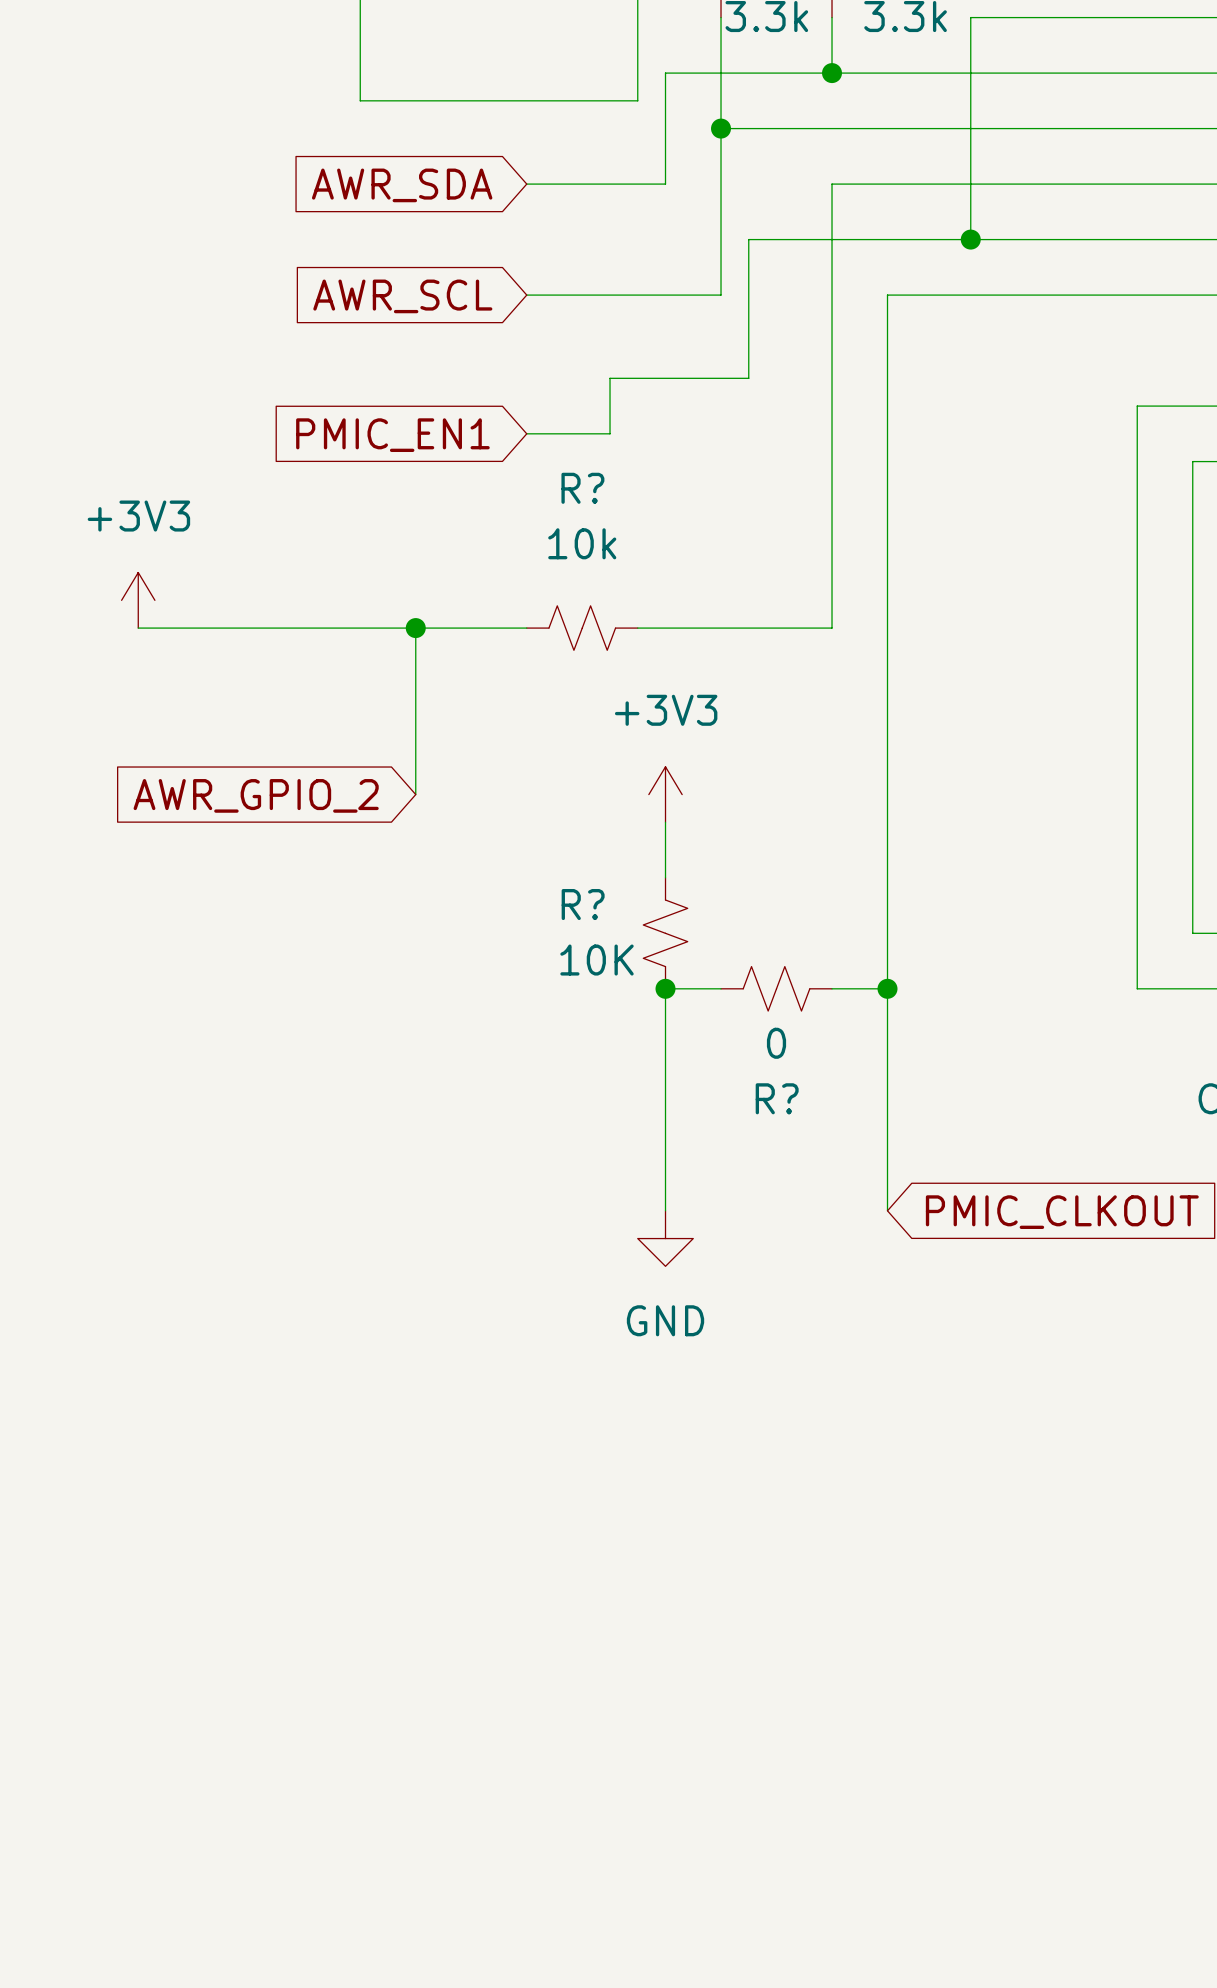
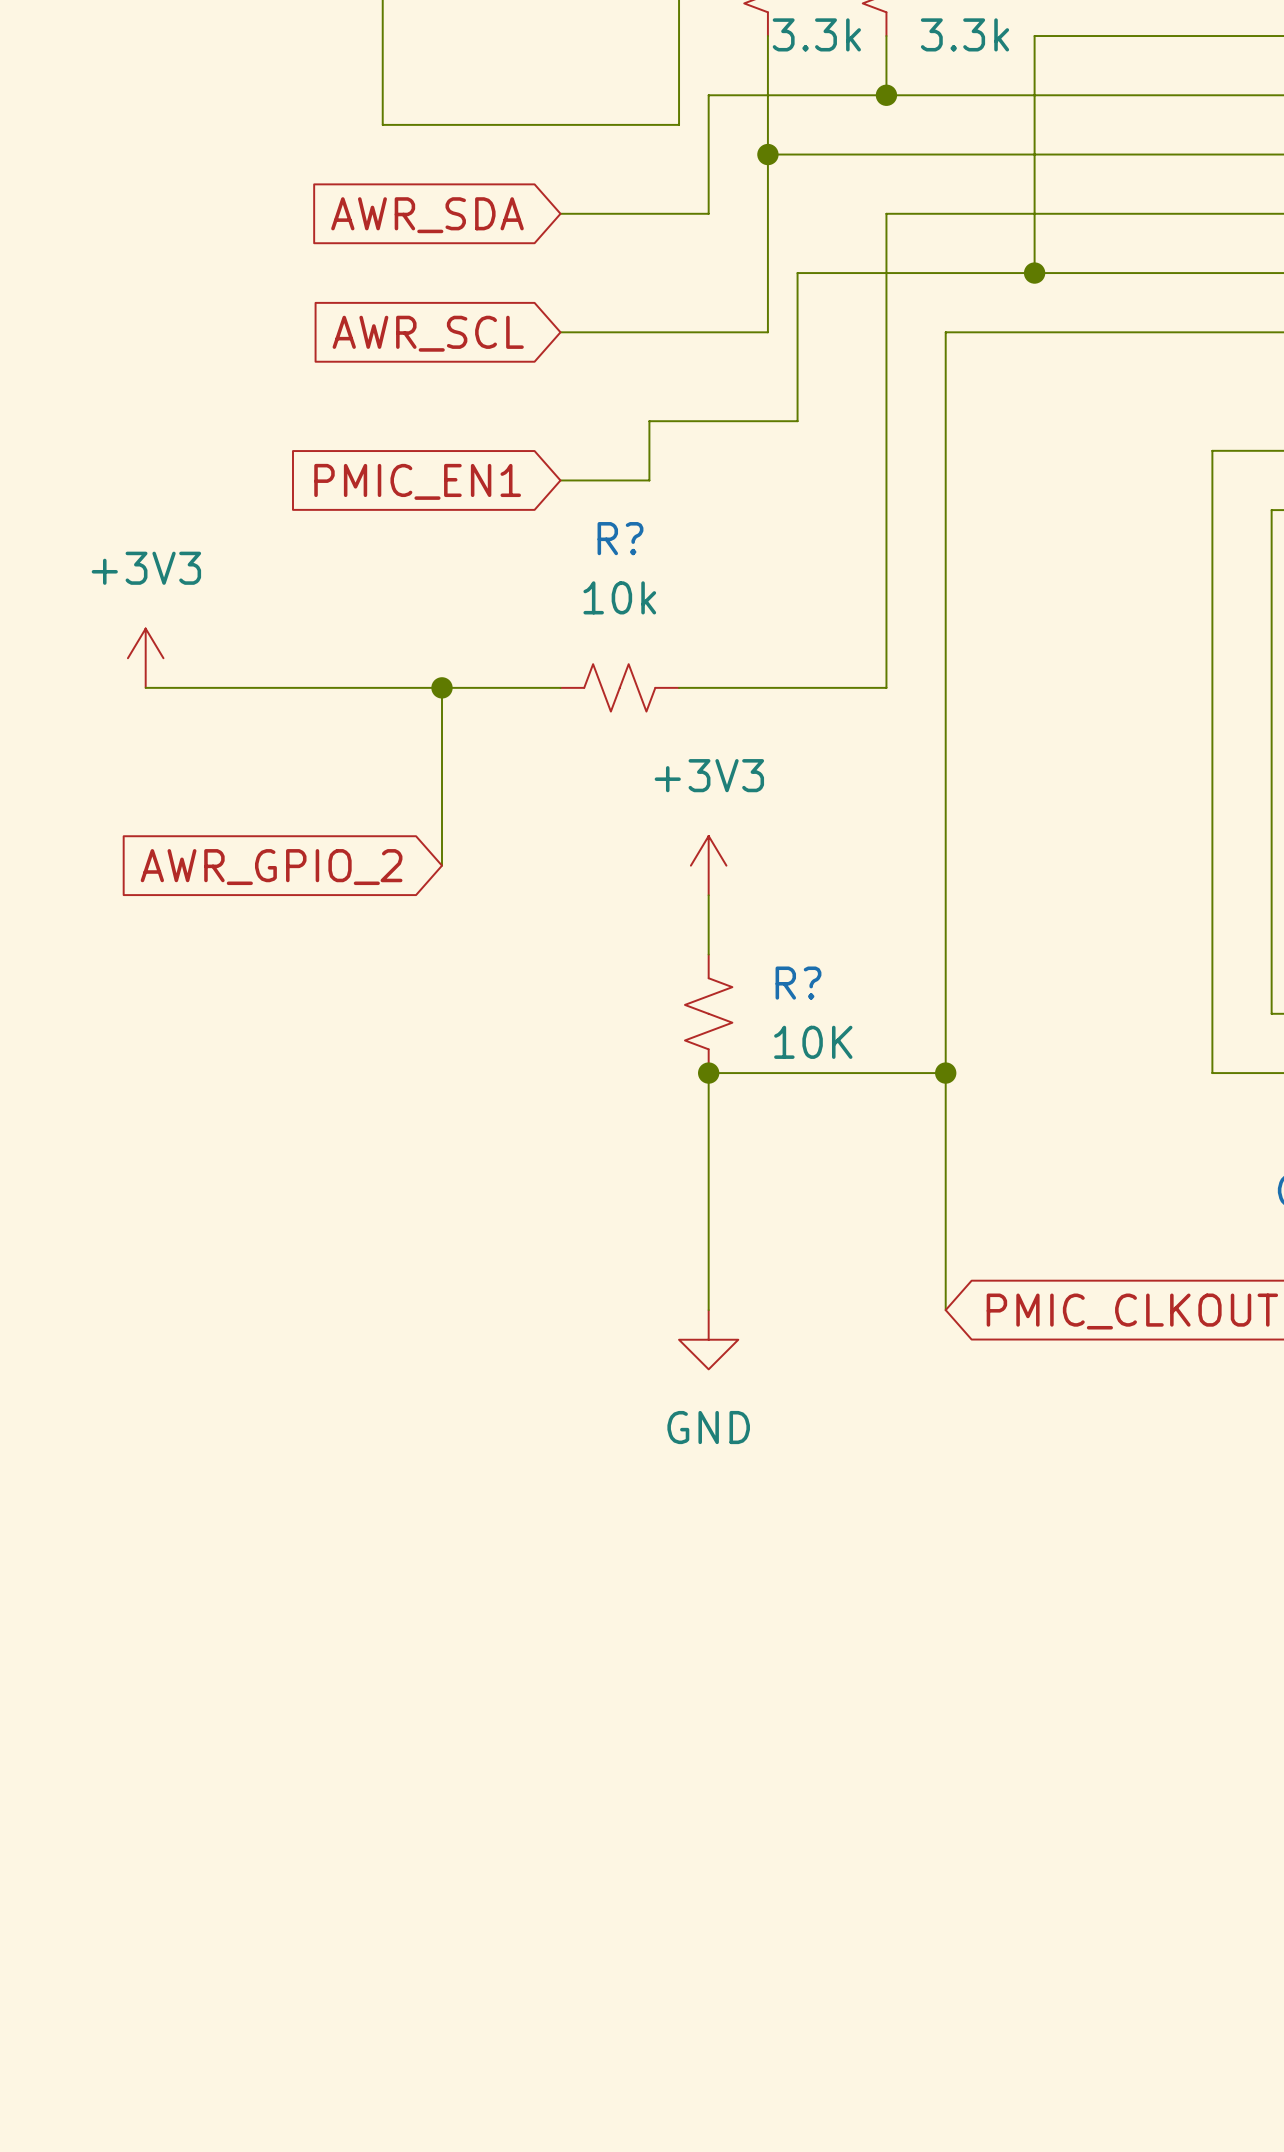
R? name position: R? (583, 904) -> R? (798, 983)
R? value position: 10K (597, 960) -> 10K (813, 1042)
wire: none -> (767, 1073) (886, 1073)
R?: 0 (776, 988) -> none

